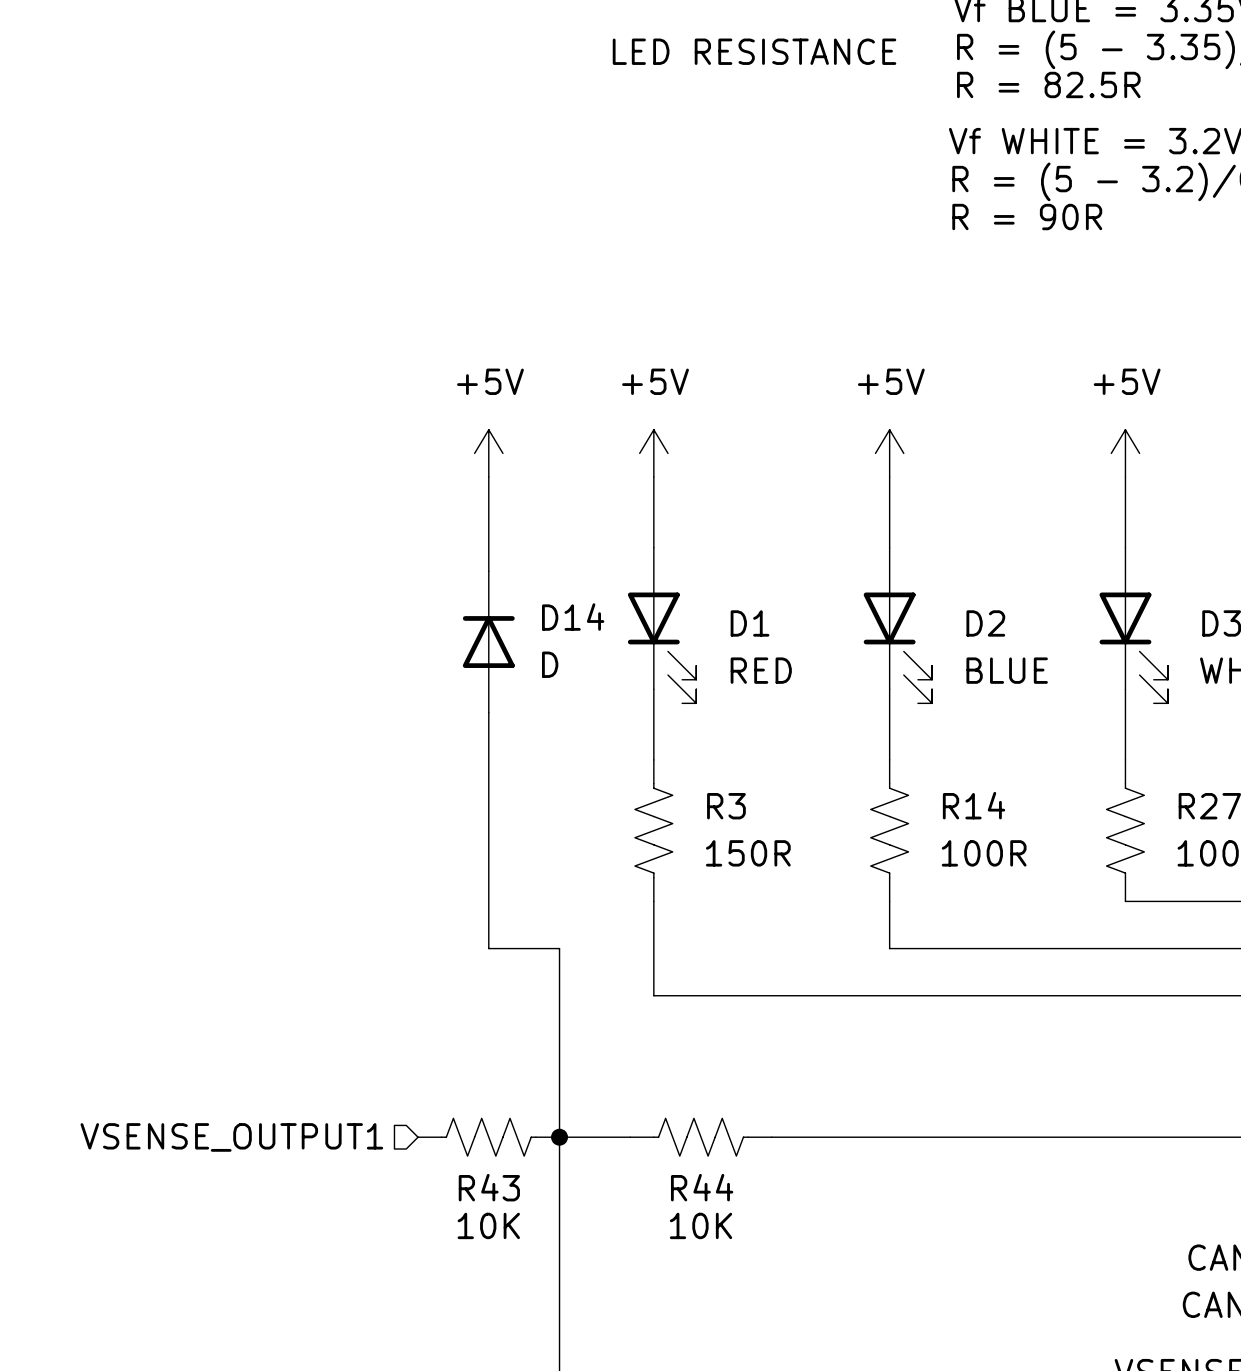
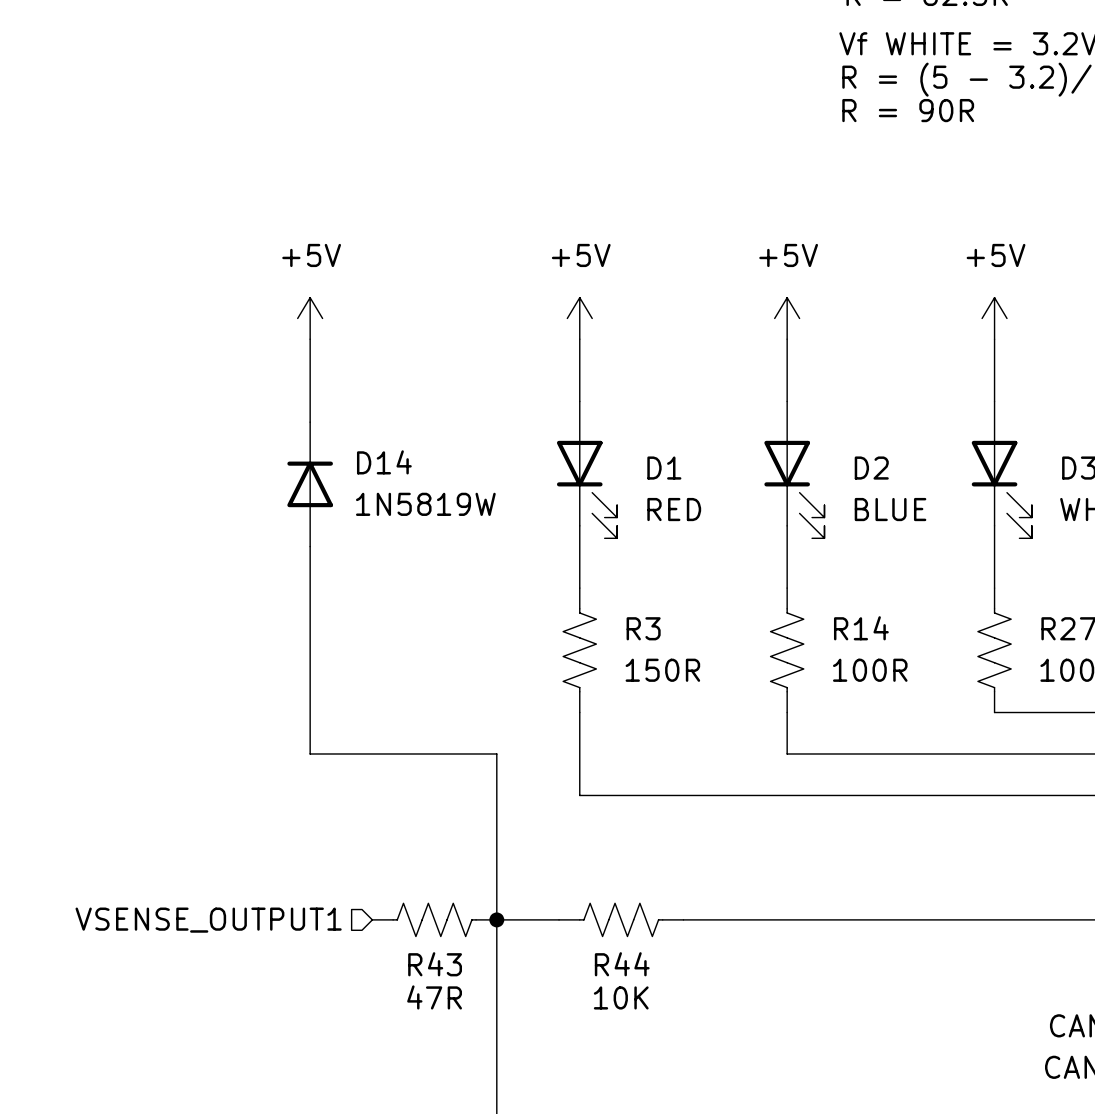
power symbol position: +5V (488, 453) -> +5V (310, 318)
wire: (488, 476) (488, 571) -> (310, 339) (310, 422)
D14 position: (488, 642) -> (310, 484)
D14 value: D (550, 664) -> 1N5819W (425, 504)
wire: (488, 712) (488, 948) -> (310, 546) (310, 753) (434, 753)
R43 value: 10K (488, 1225) -> 47R (434, 997)

